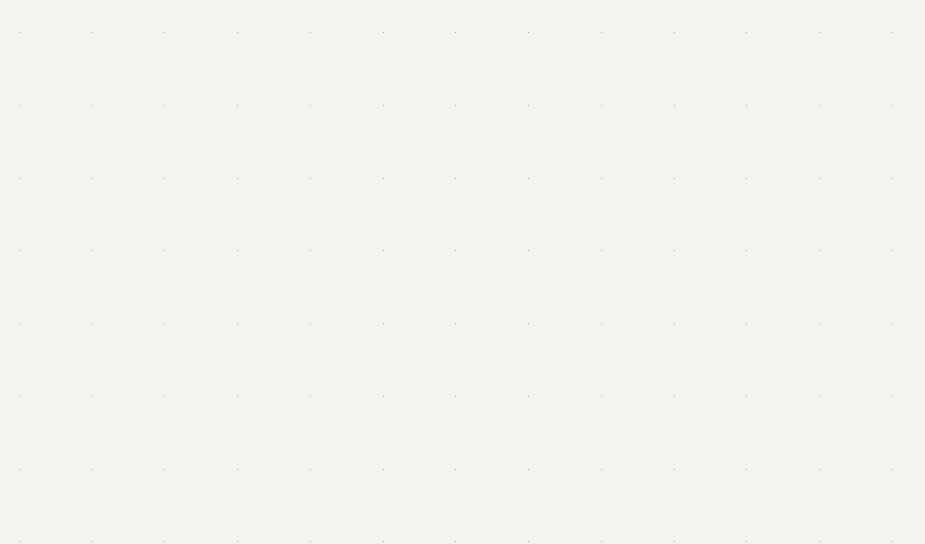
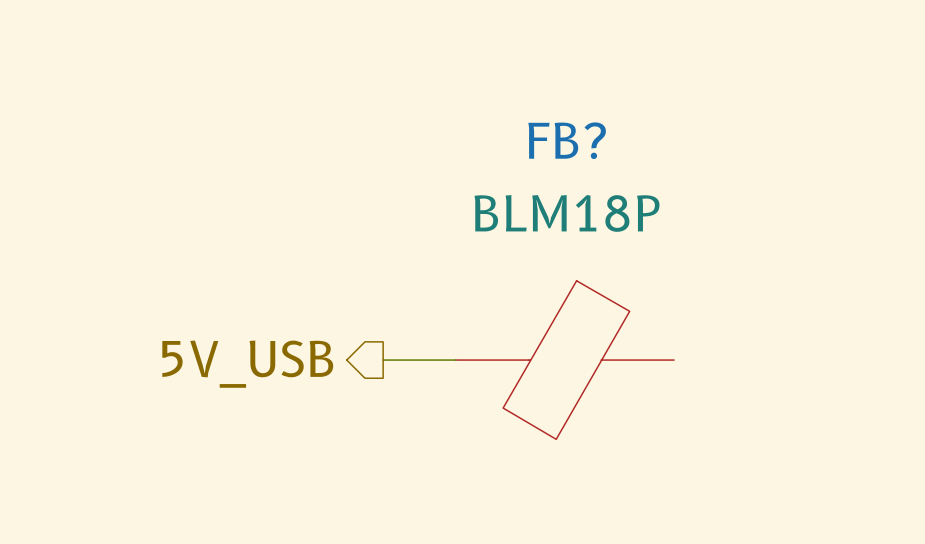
wire: none -> (383, 360) (455, 360)
FB?: none -> BLM18P (564, 360)
hierarchical label: none -> 5V_USB (247, 364)

